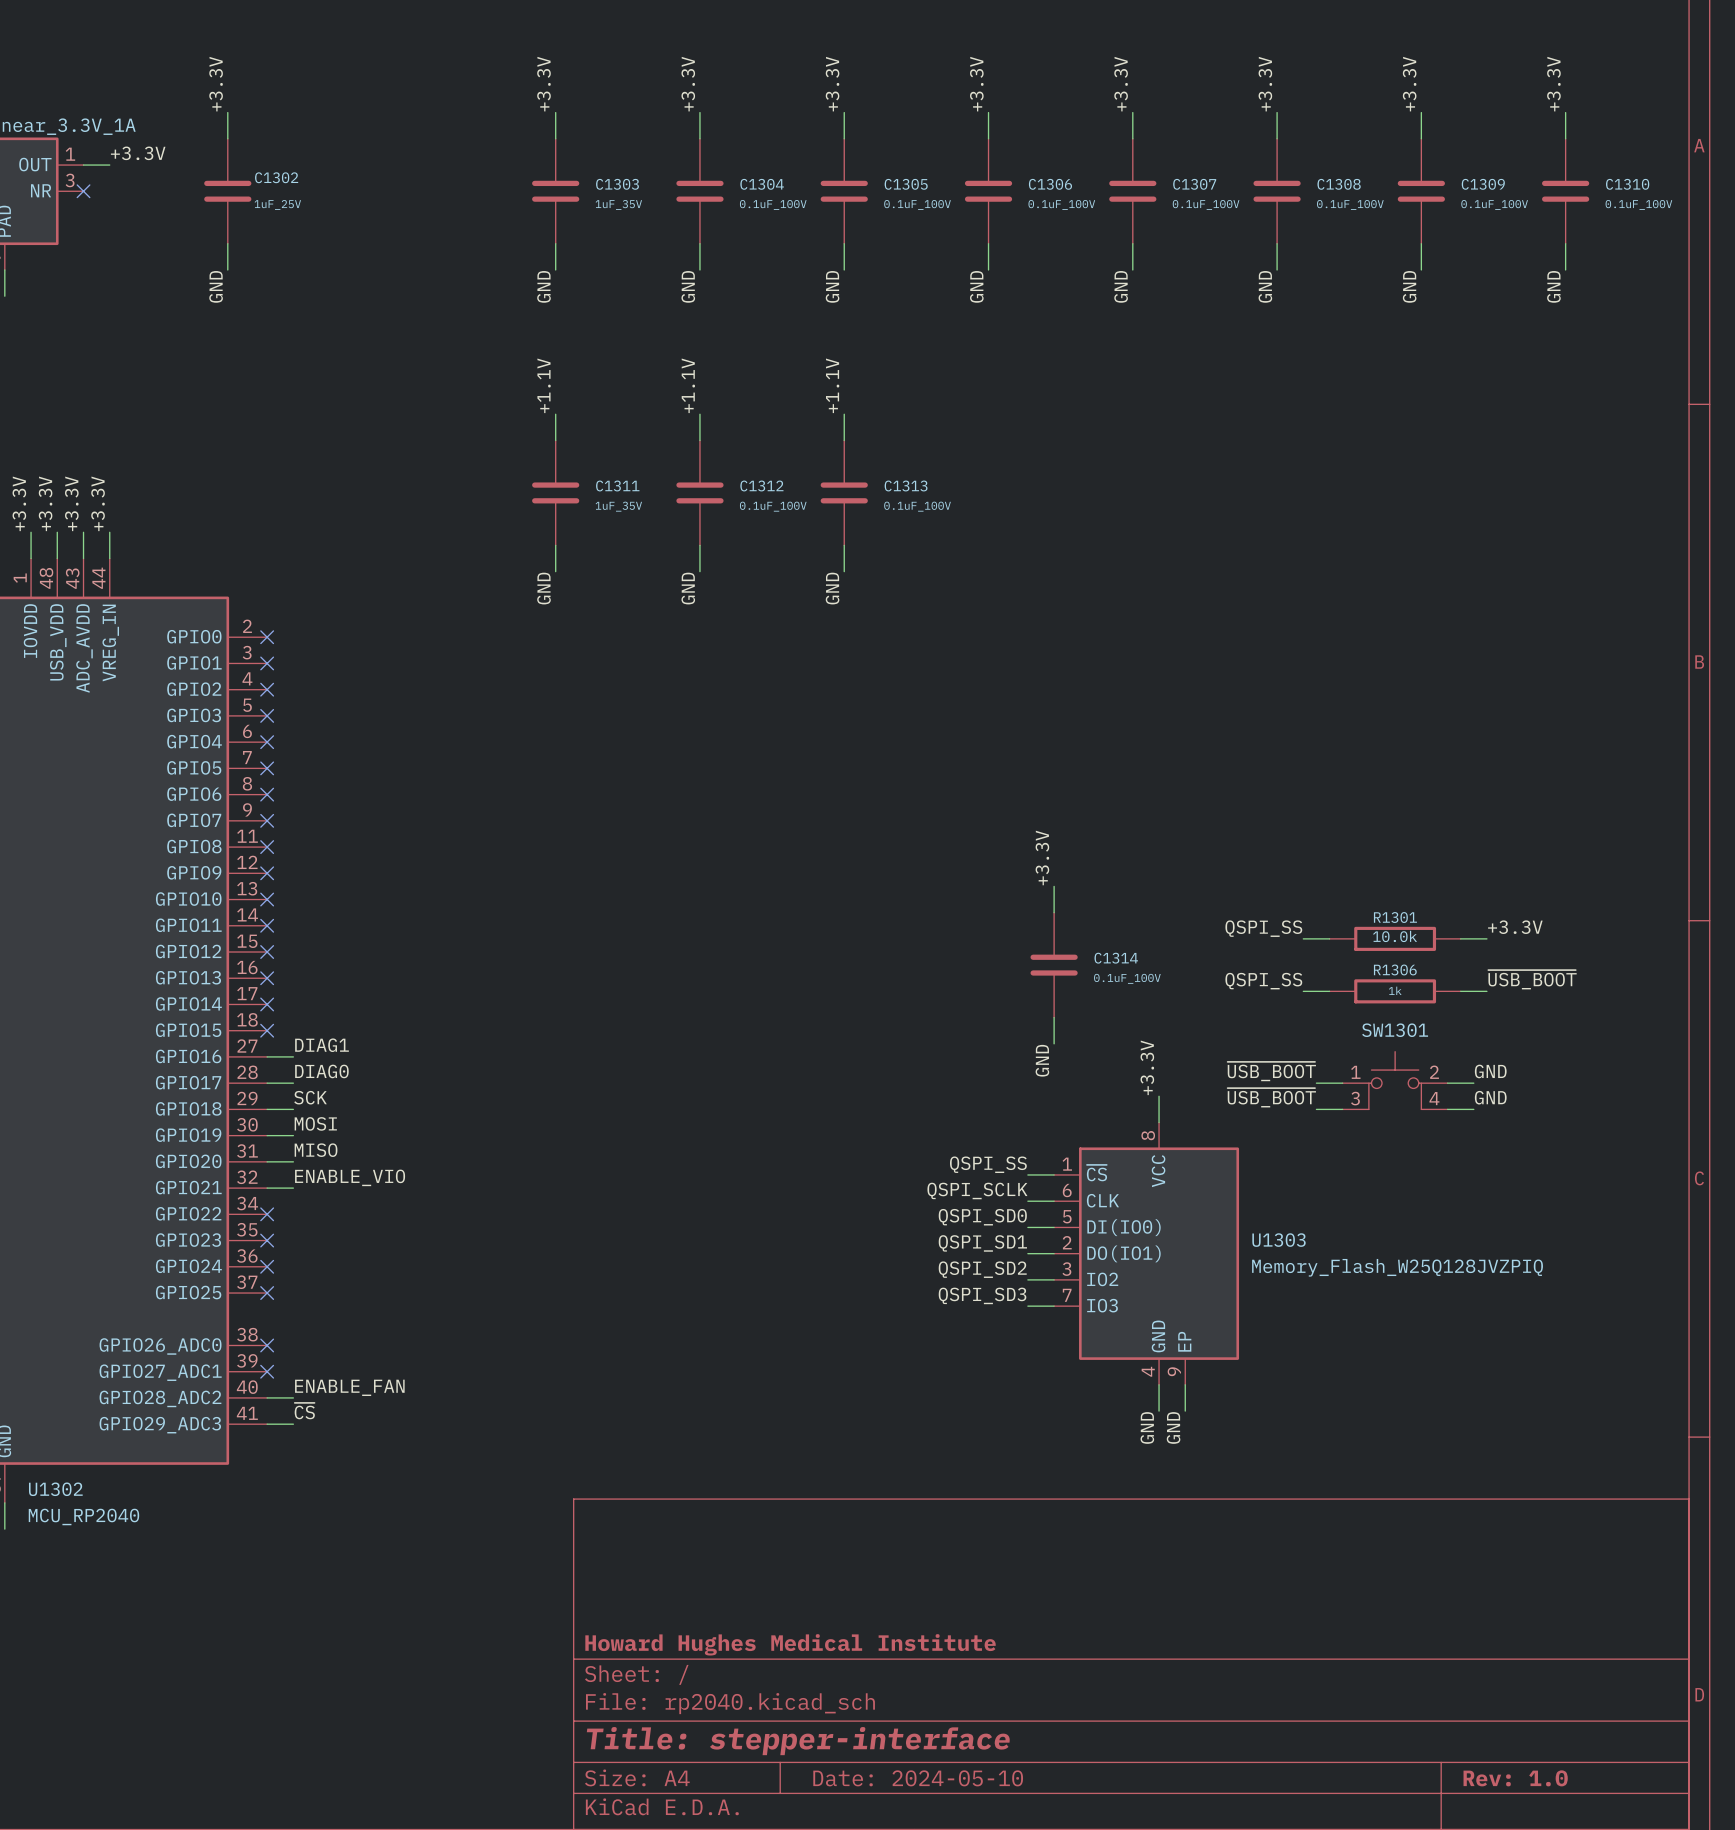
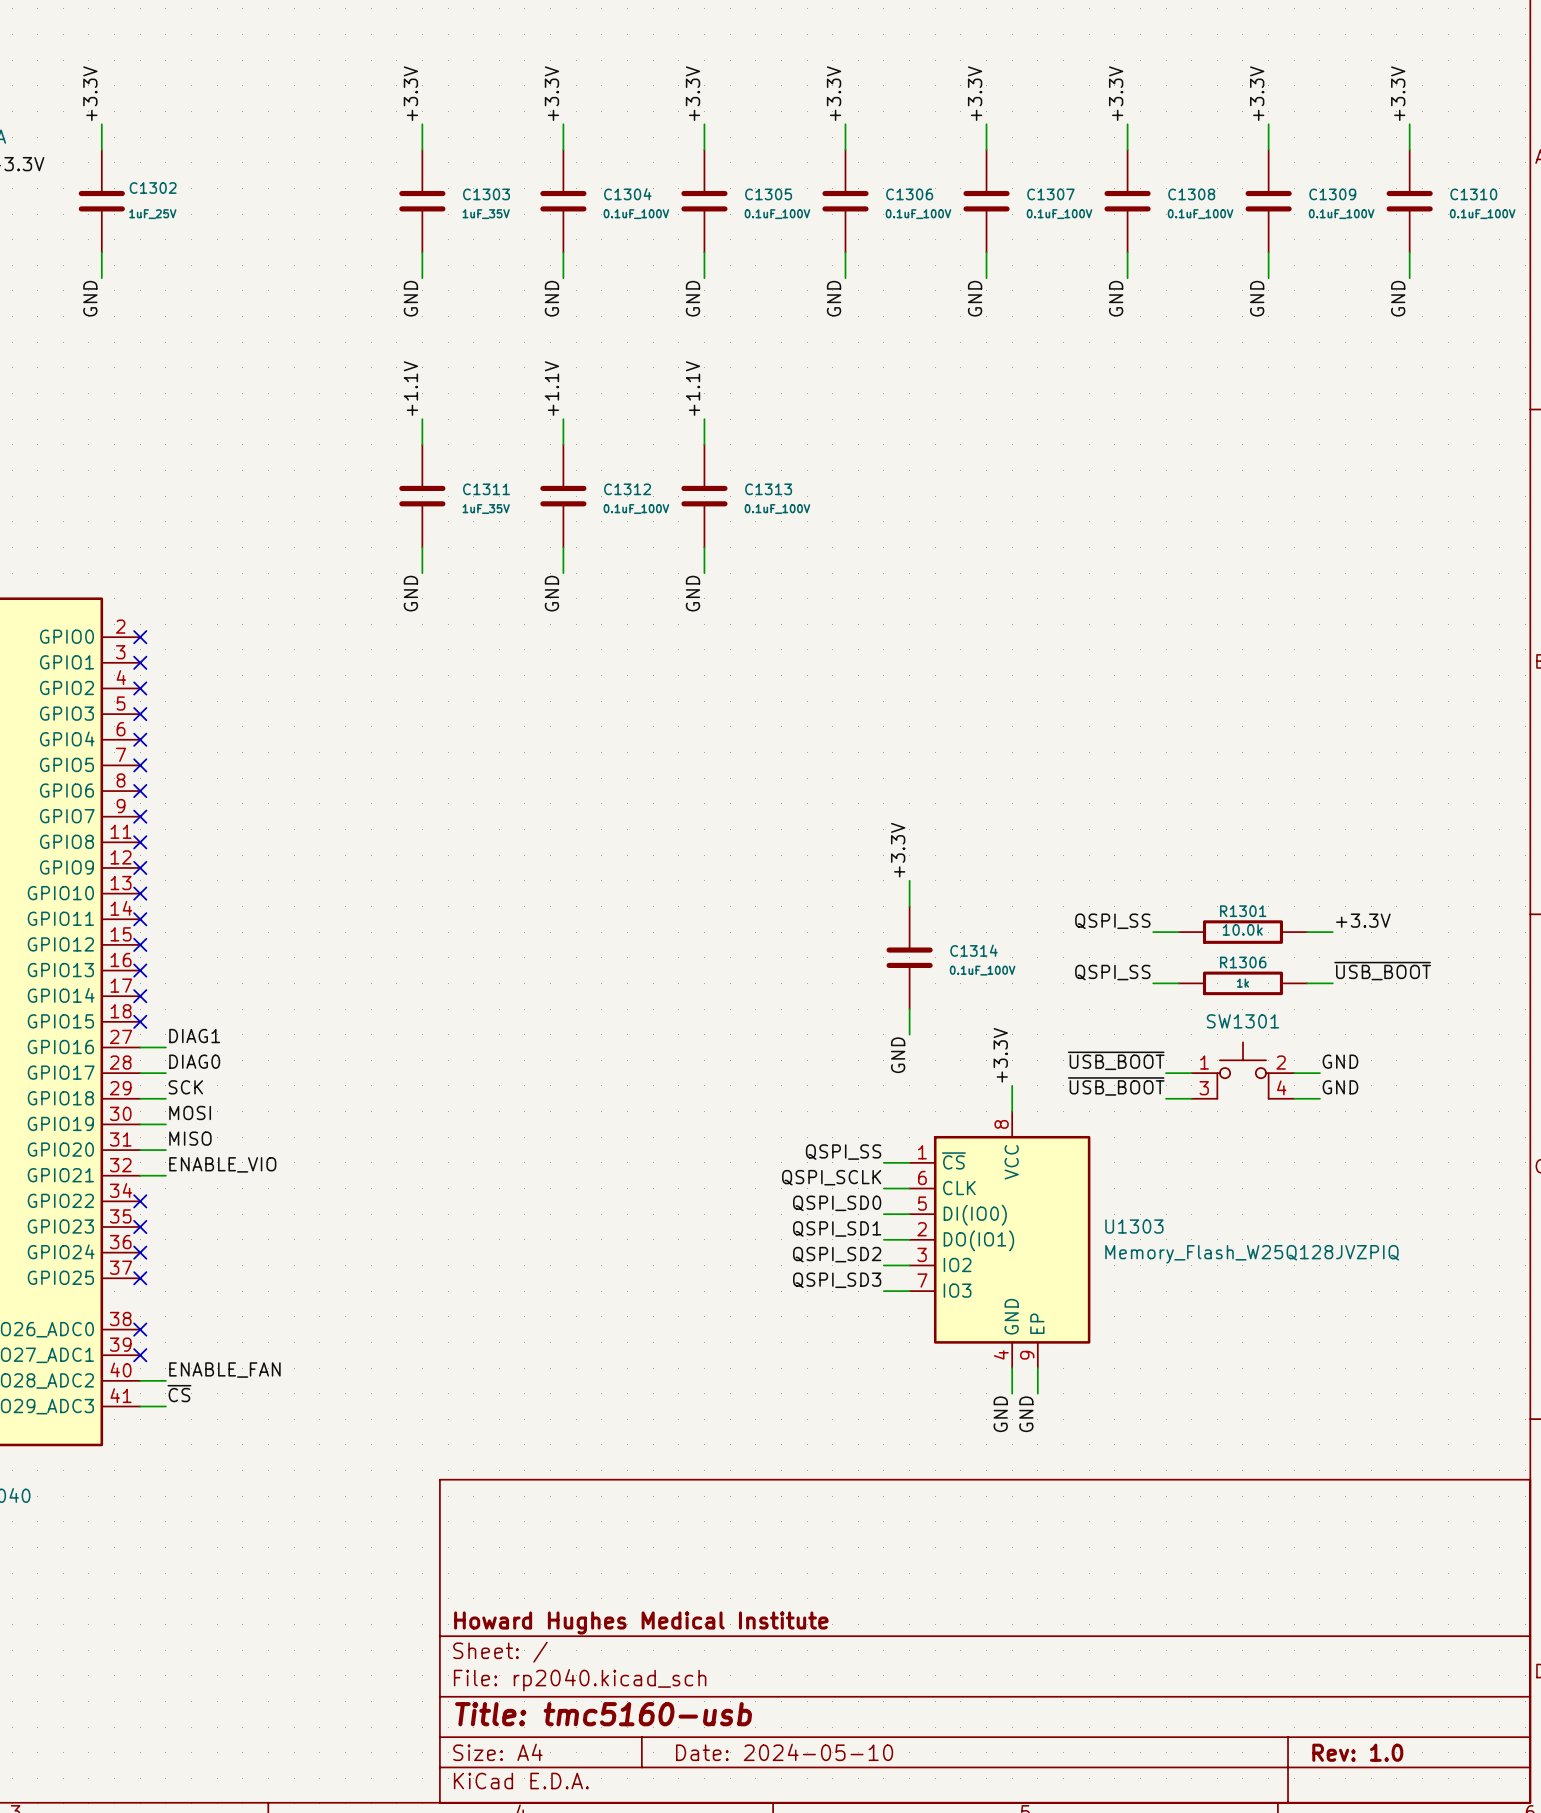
title block: Title: stepper-interface (798, 1741) -> Title: tmc5160-usb (603, 1714)

